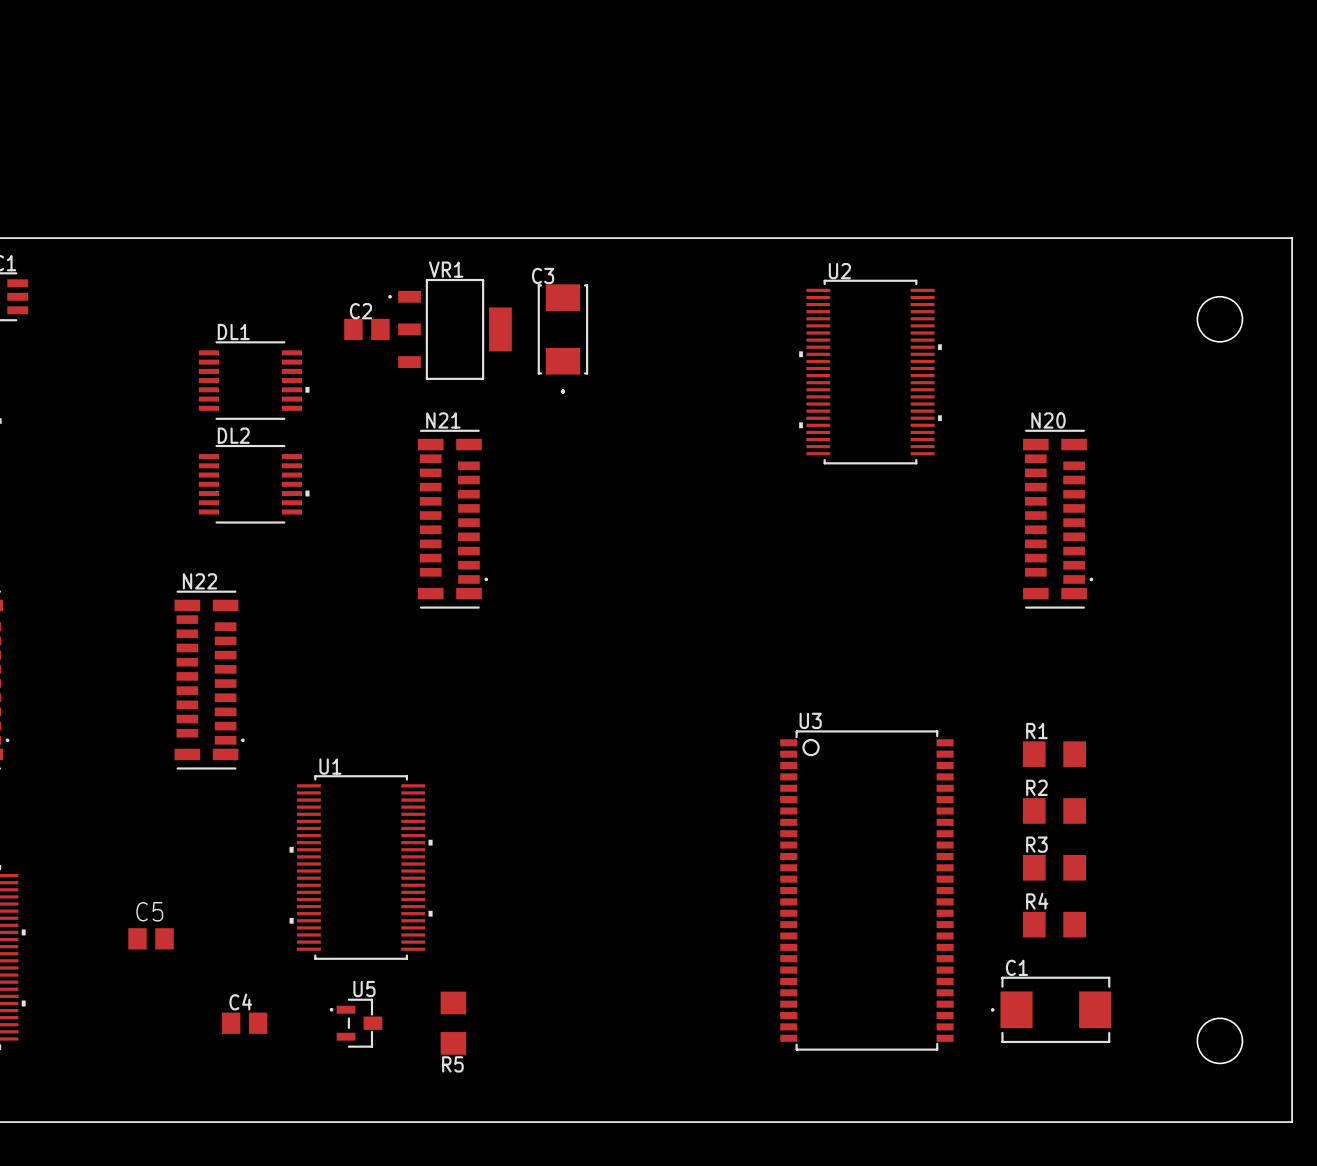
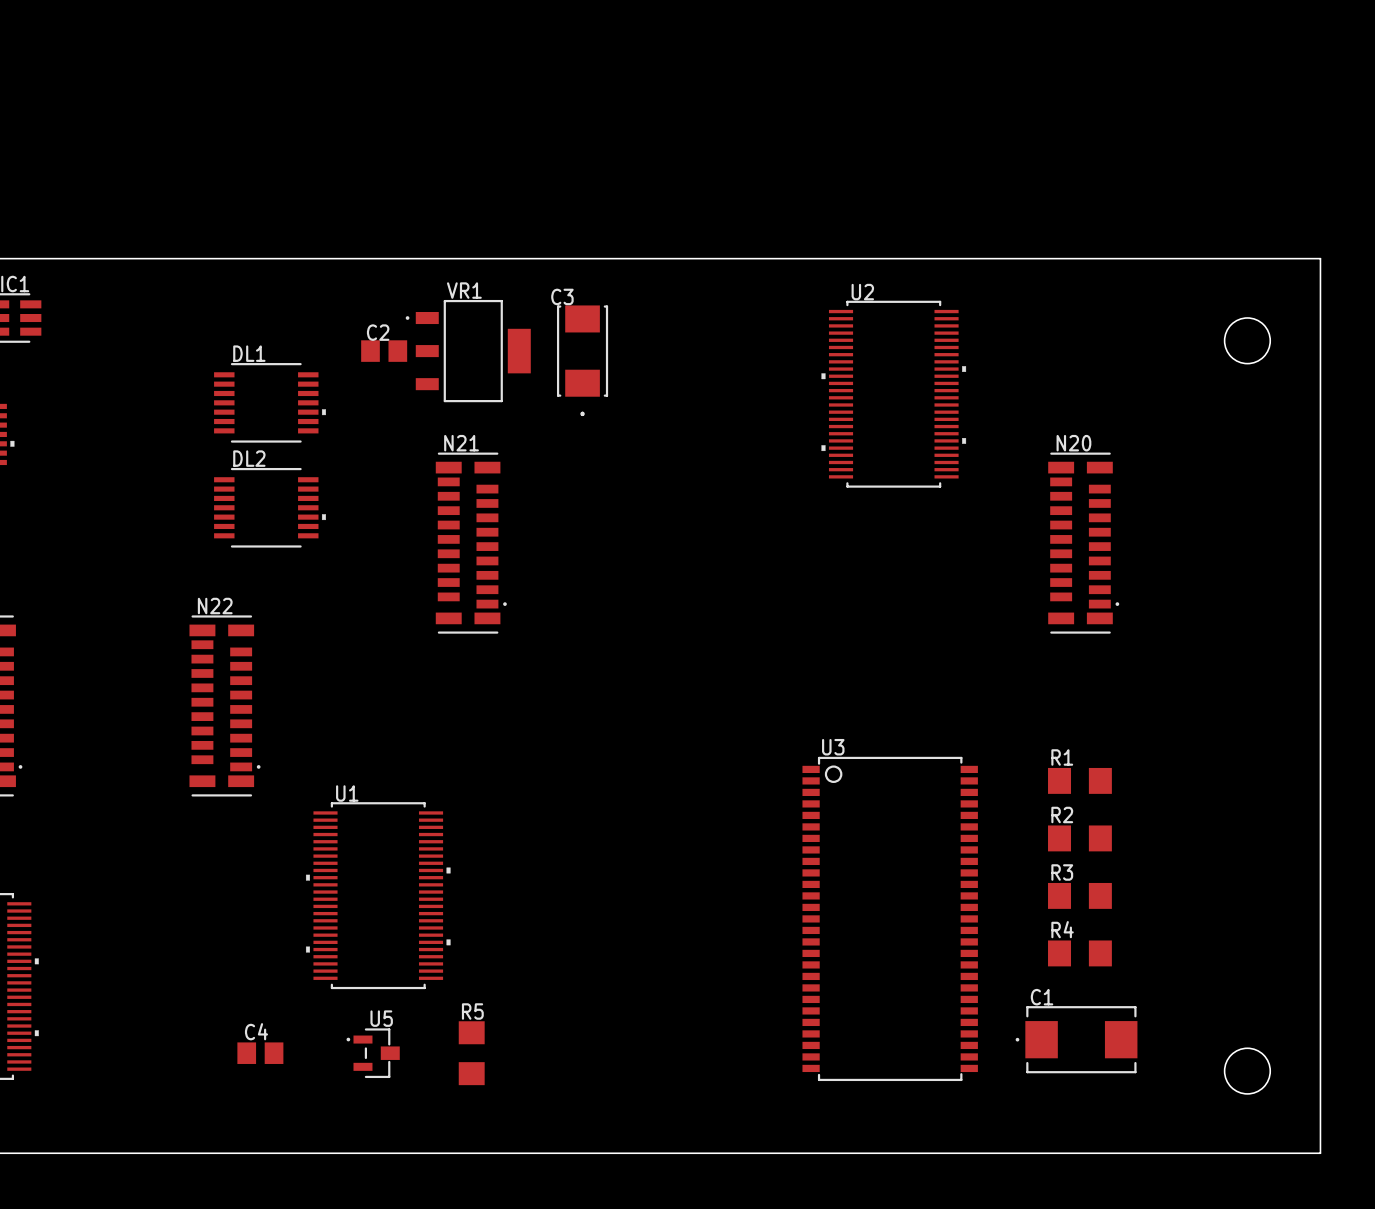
C5: (151, 938) -> none
R5 name position: R5 (452, 1064) -> R5 (472, 1011)

